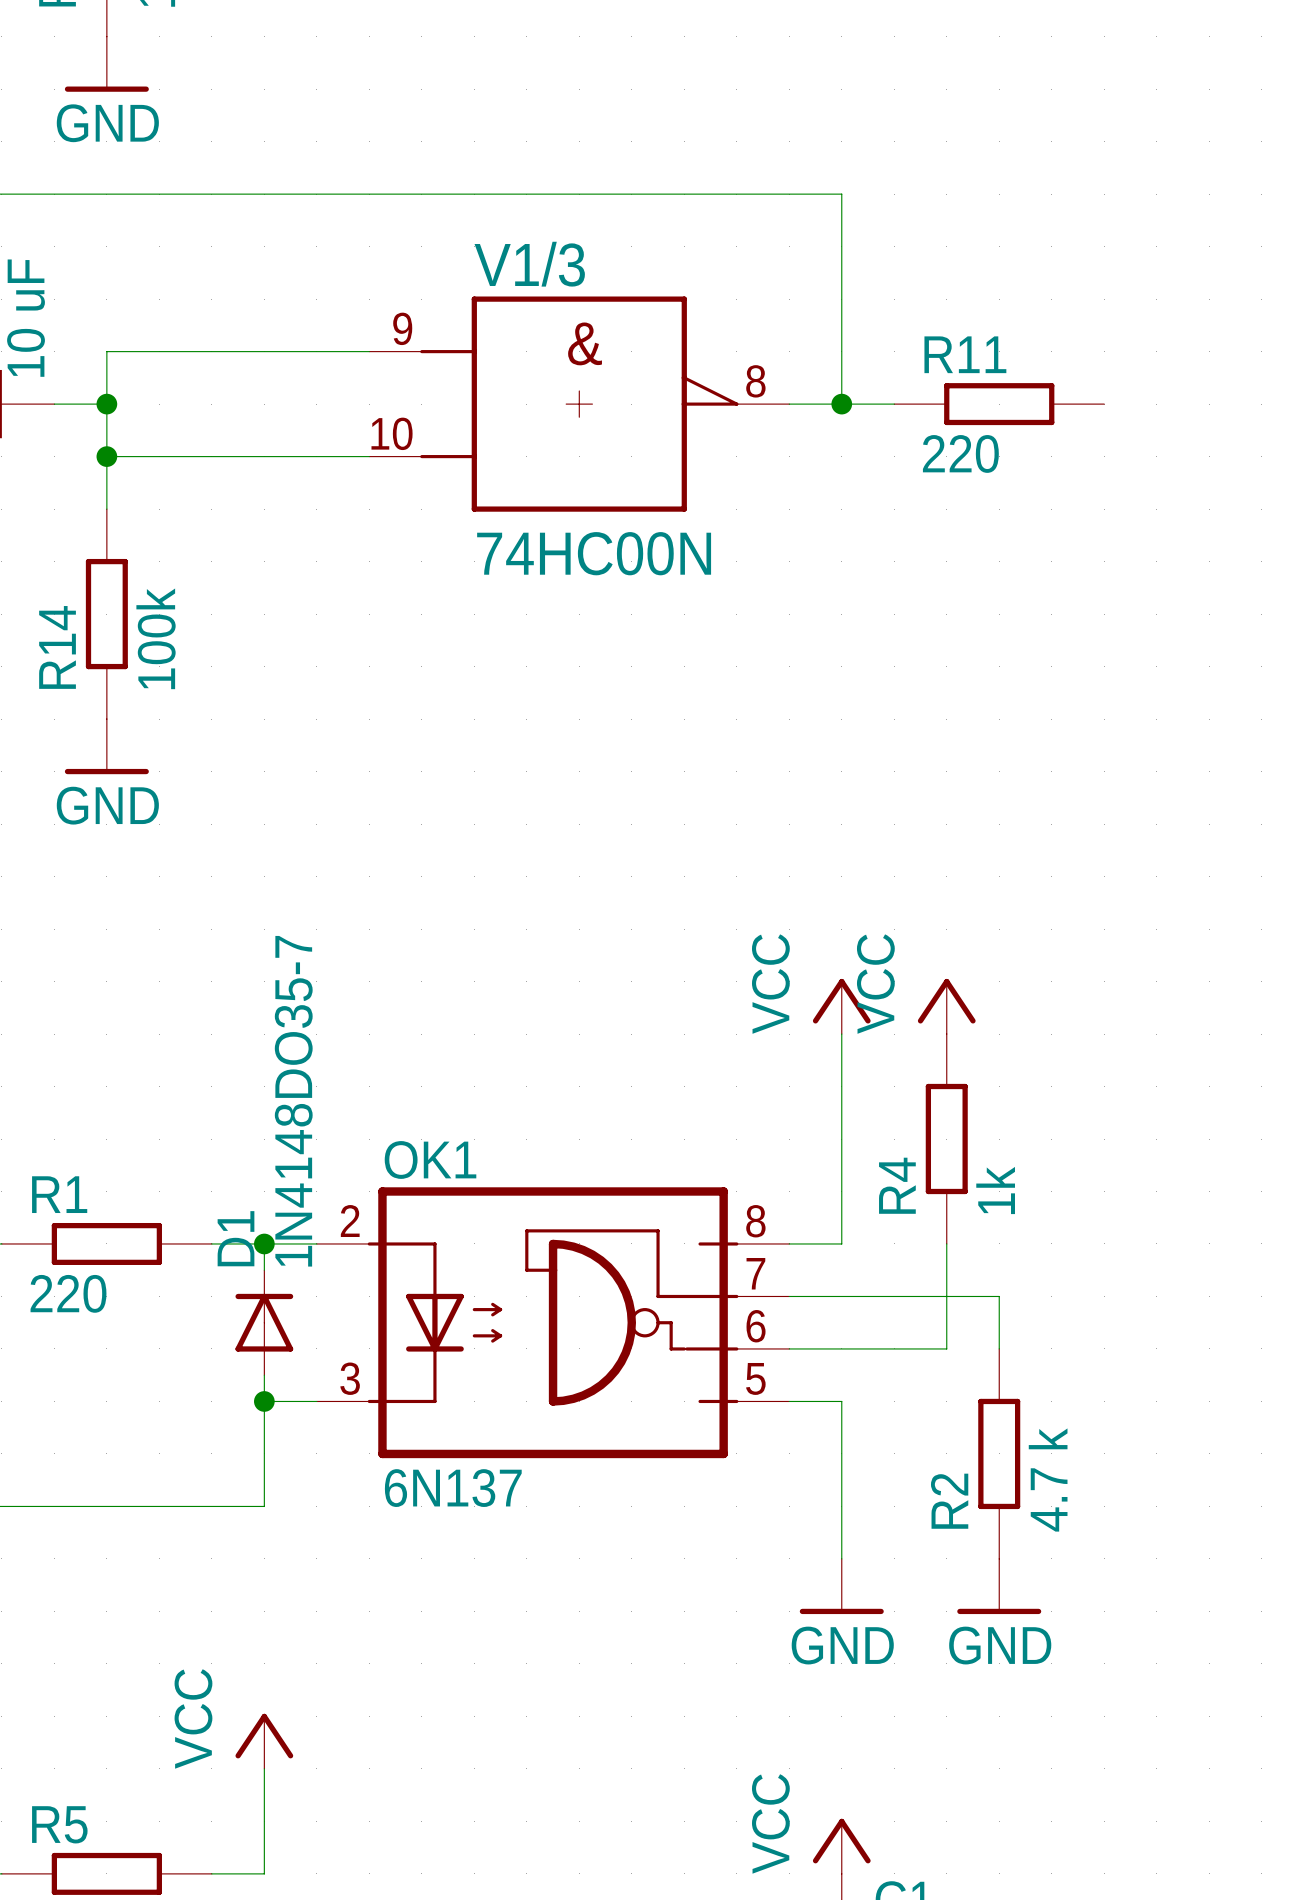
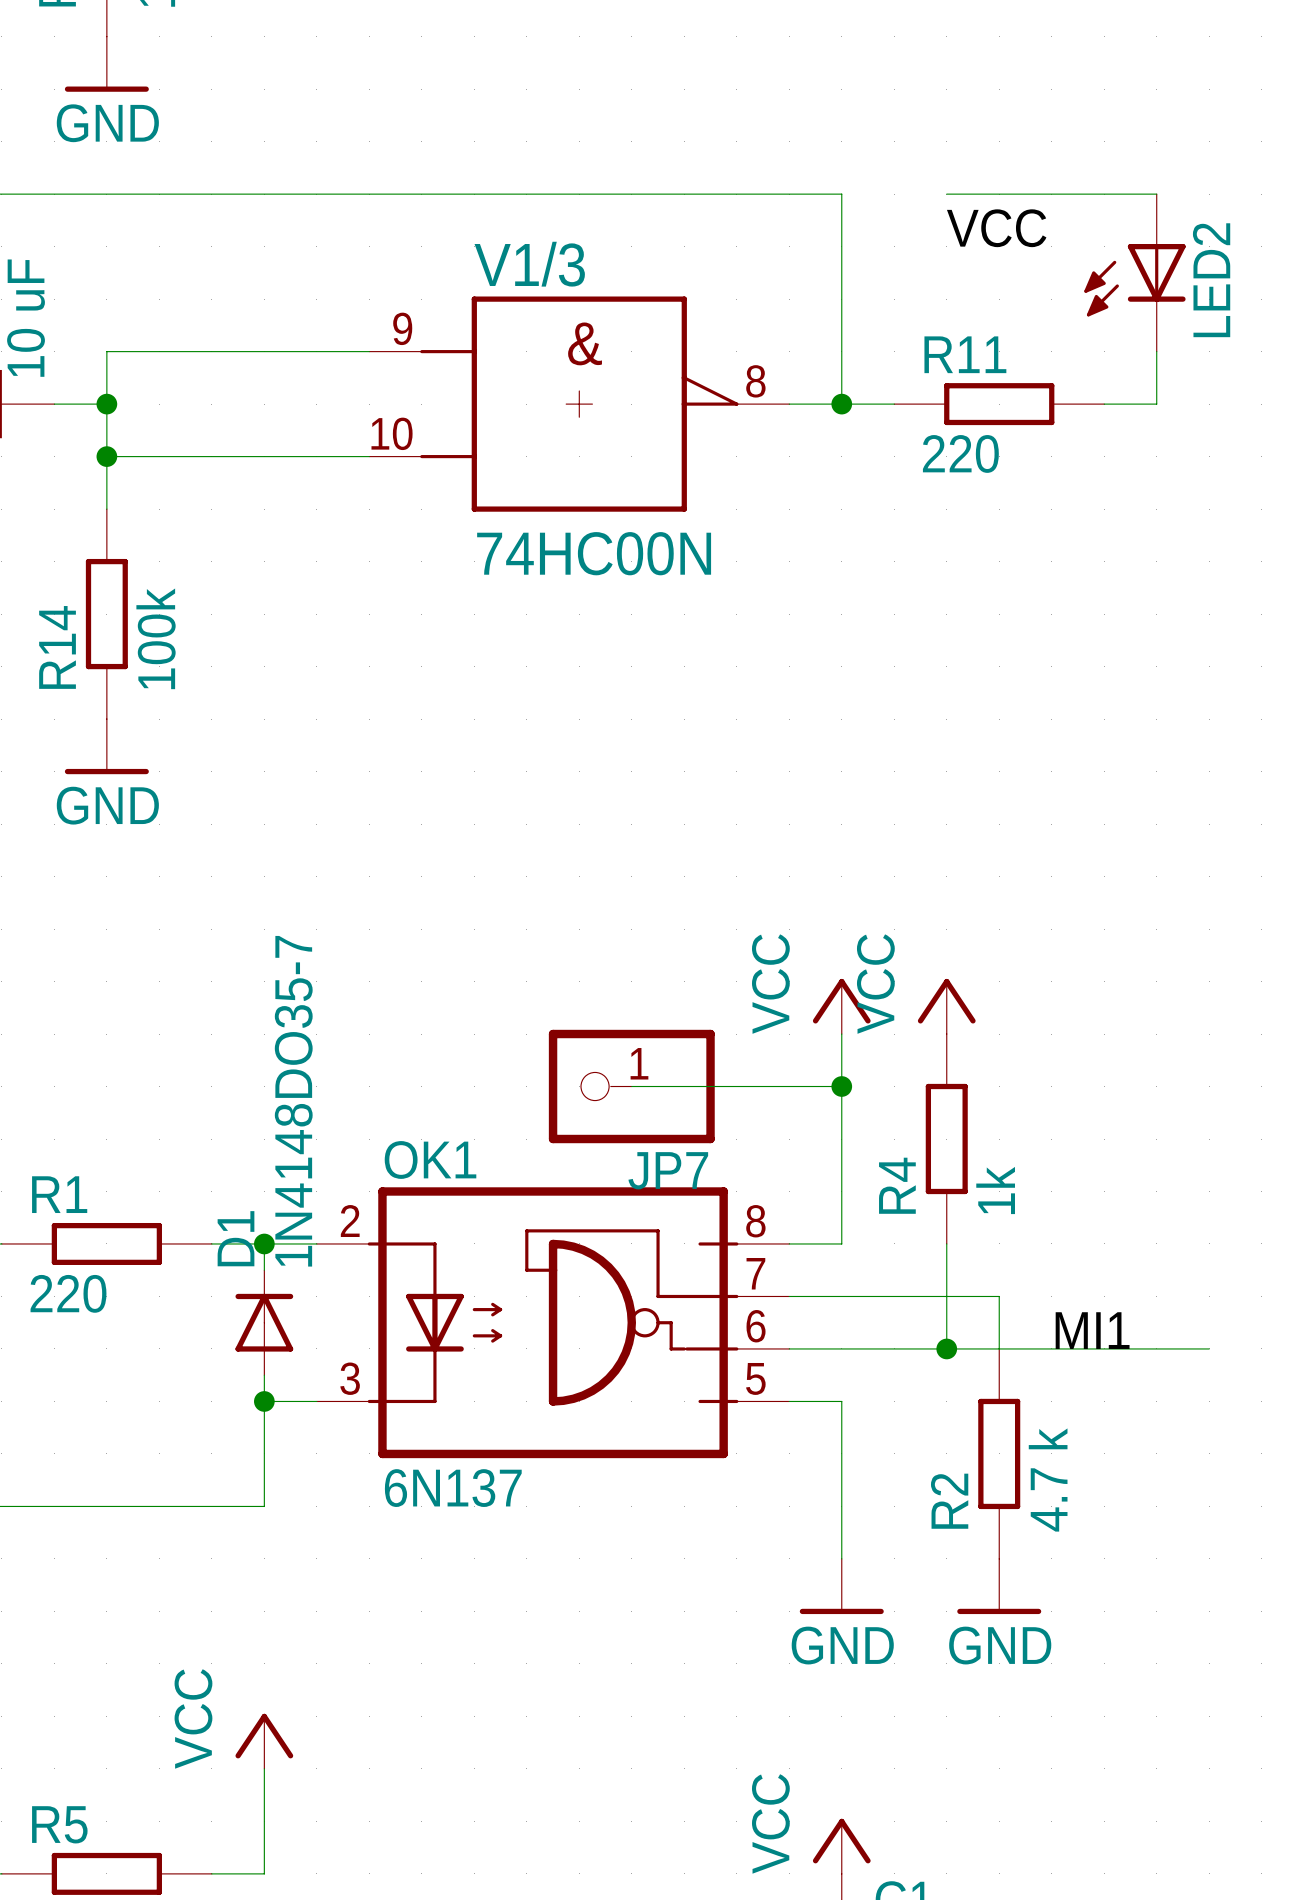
wire: none -> (946, 194) (1156, 194)
label: none -> VCC (996, 228)
LED2: none -> (1134, 272)
wire: none -> (1156, 351) (1156, 404) (1104, 404)
wire: none -> (631, 1086) (841, 1086)
JP7: none -> (631, 1086)
junction: none -> (841, 1086)
label: none -> MI1 (1092, 1330)
wire: none -> (946, 1348) (1209, 1348)
junction: none -> (946, 1348)

